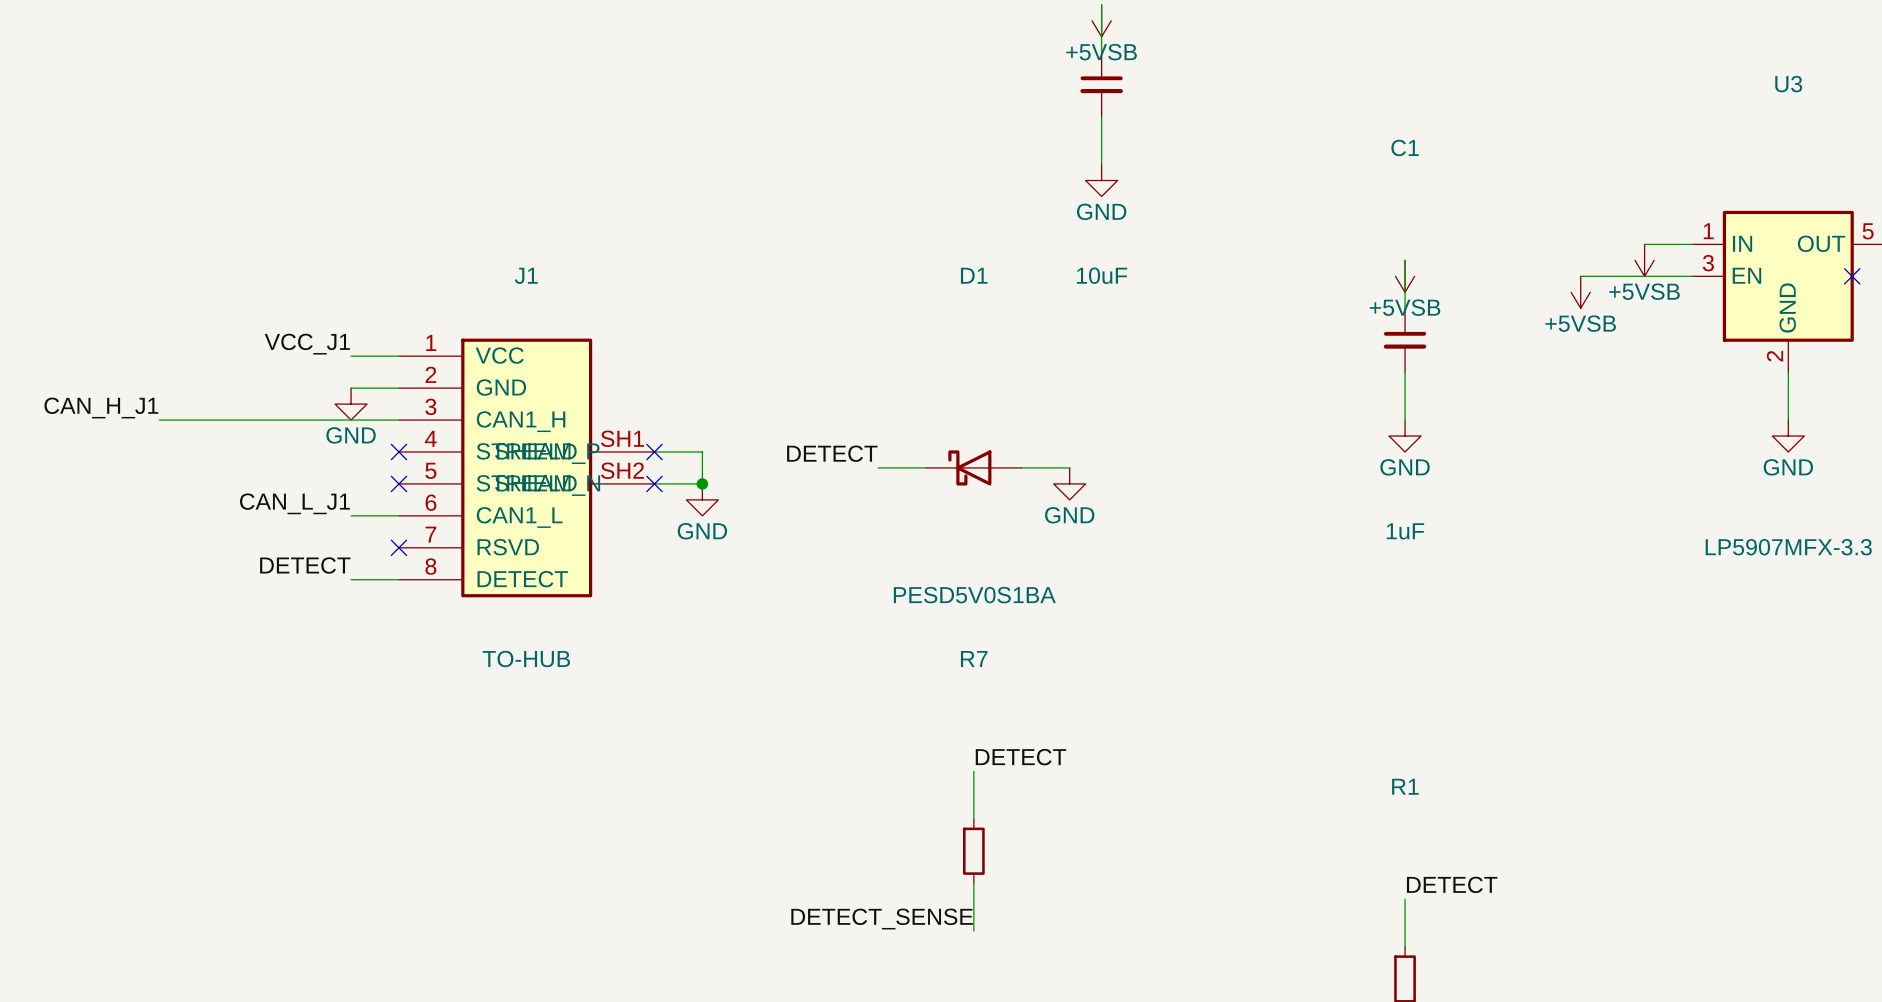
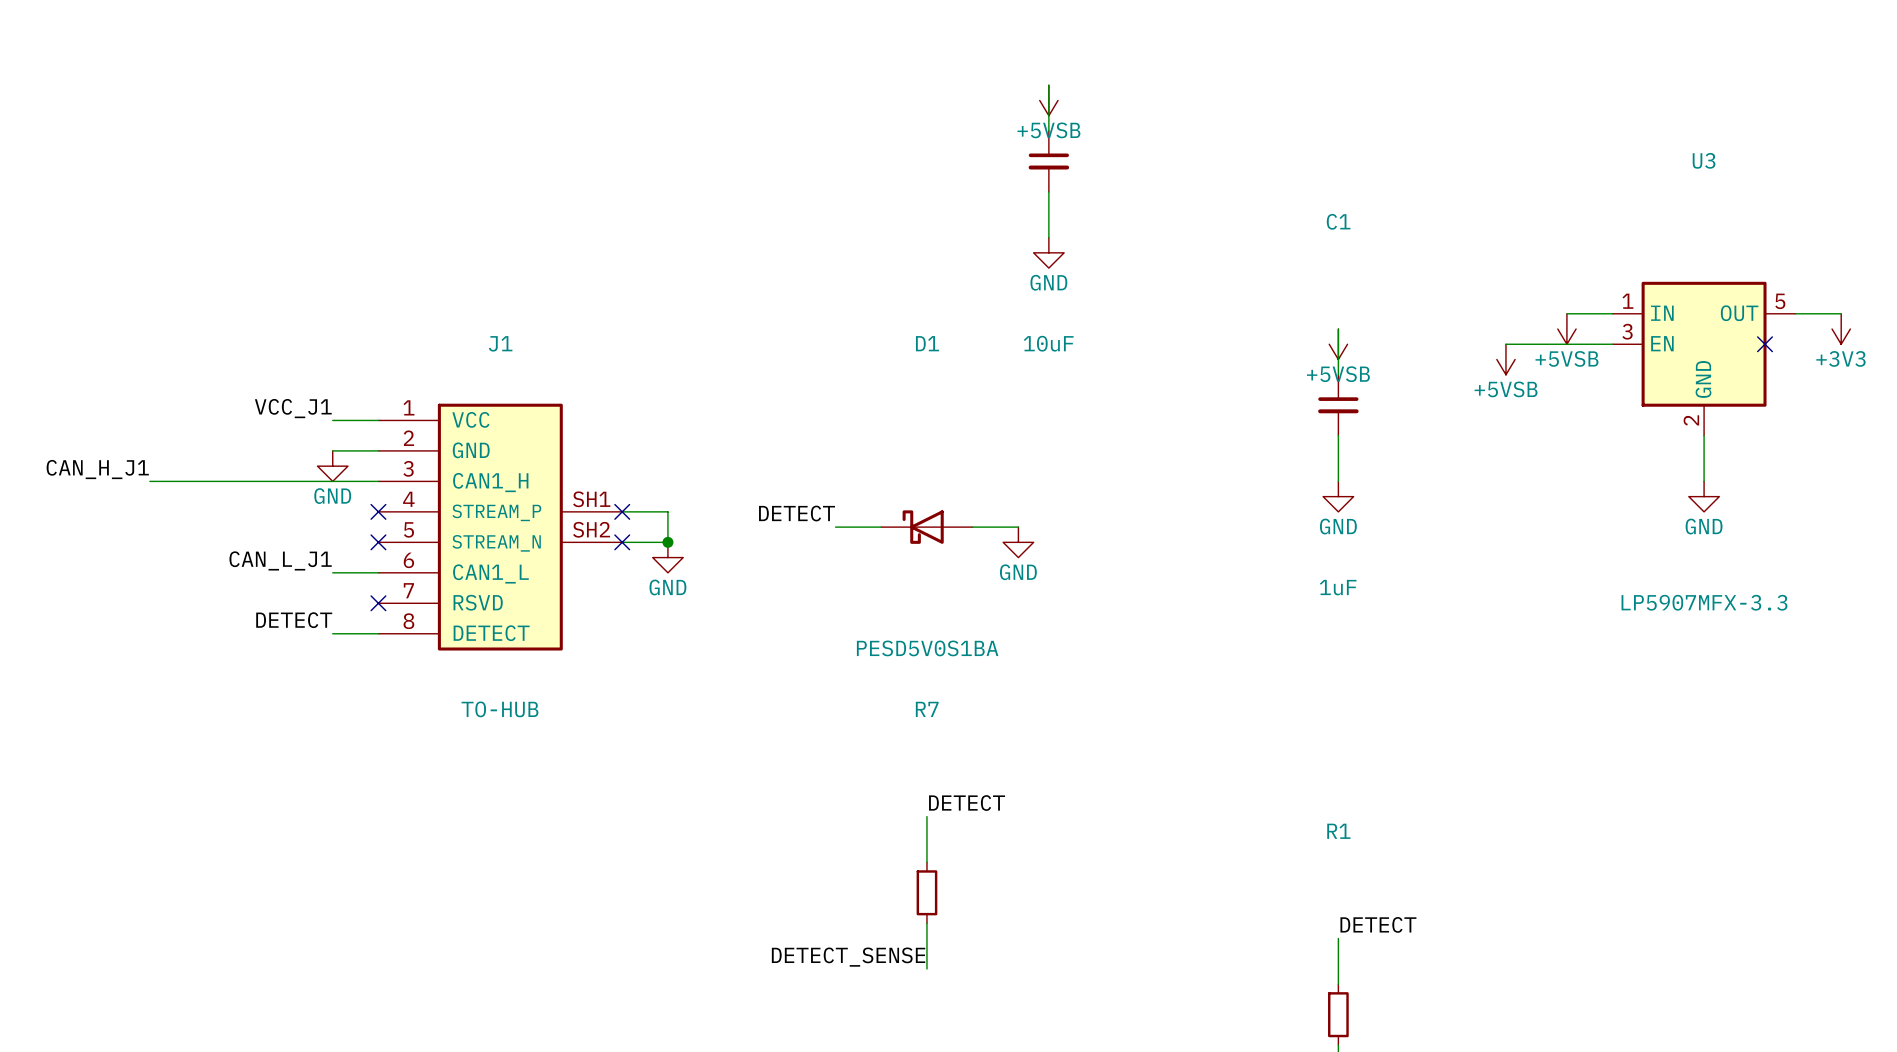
J1 symbol: [398, 338, 655, 598] -> [378, 403, 623, 651]

